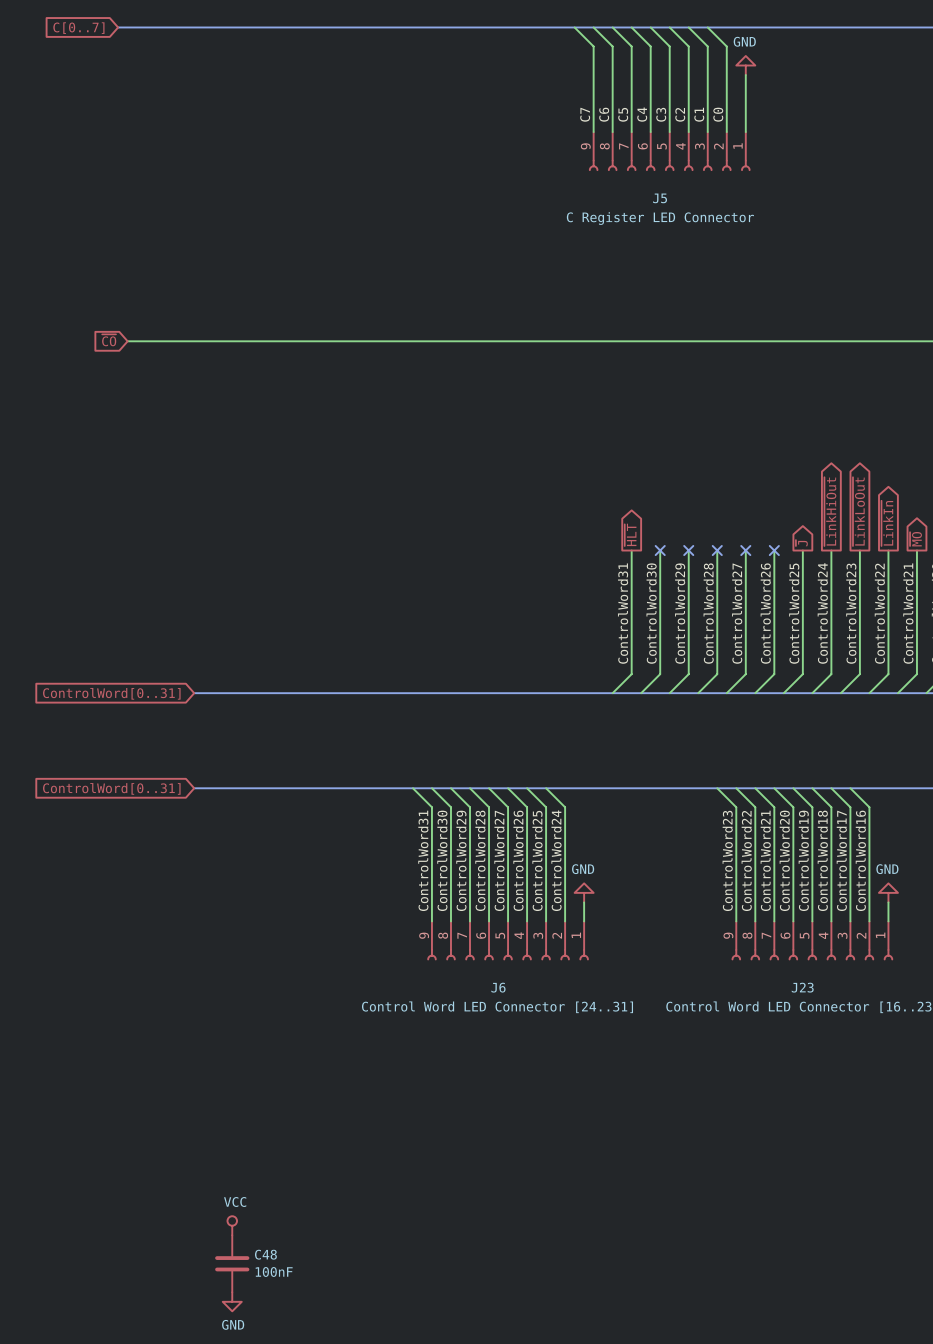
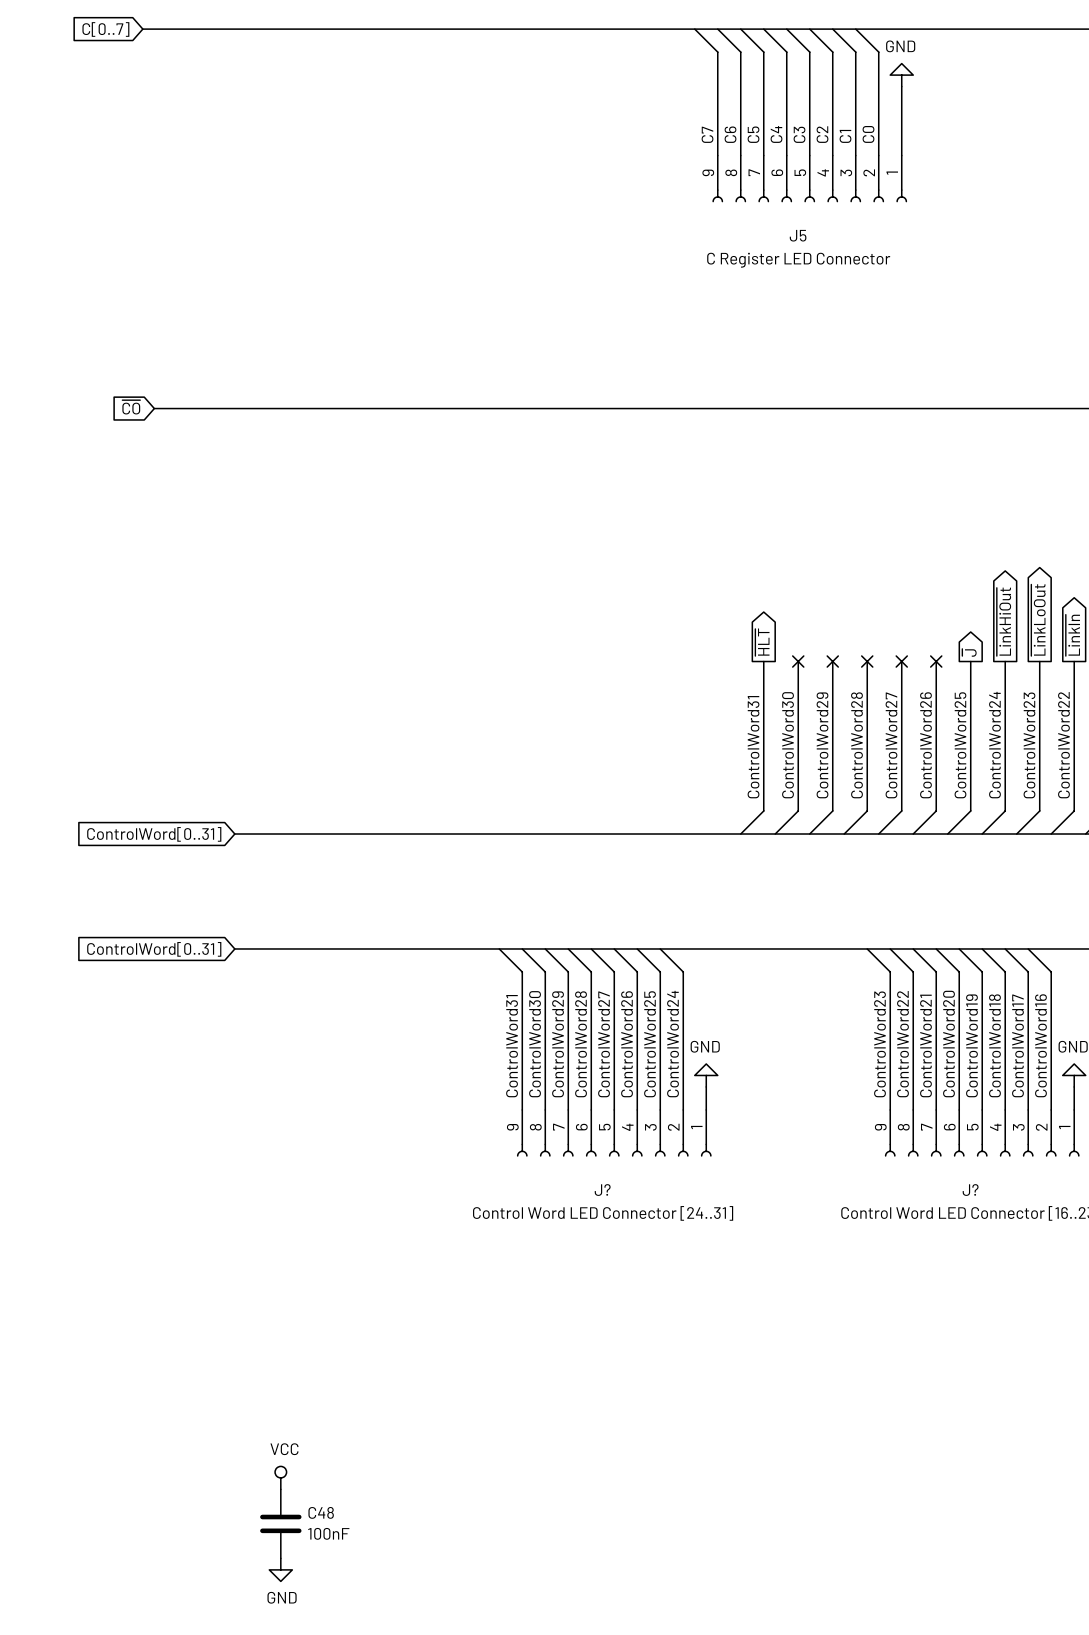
J6 name: J6 (498, 987) -> J? (602, 1190)
J23 name: J23 (802, 987) -> J? (970, 1190)

